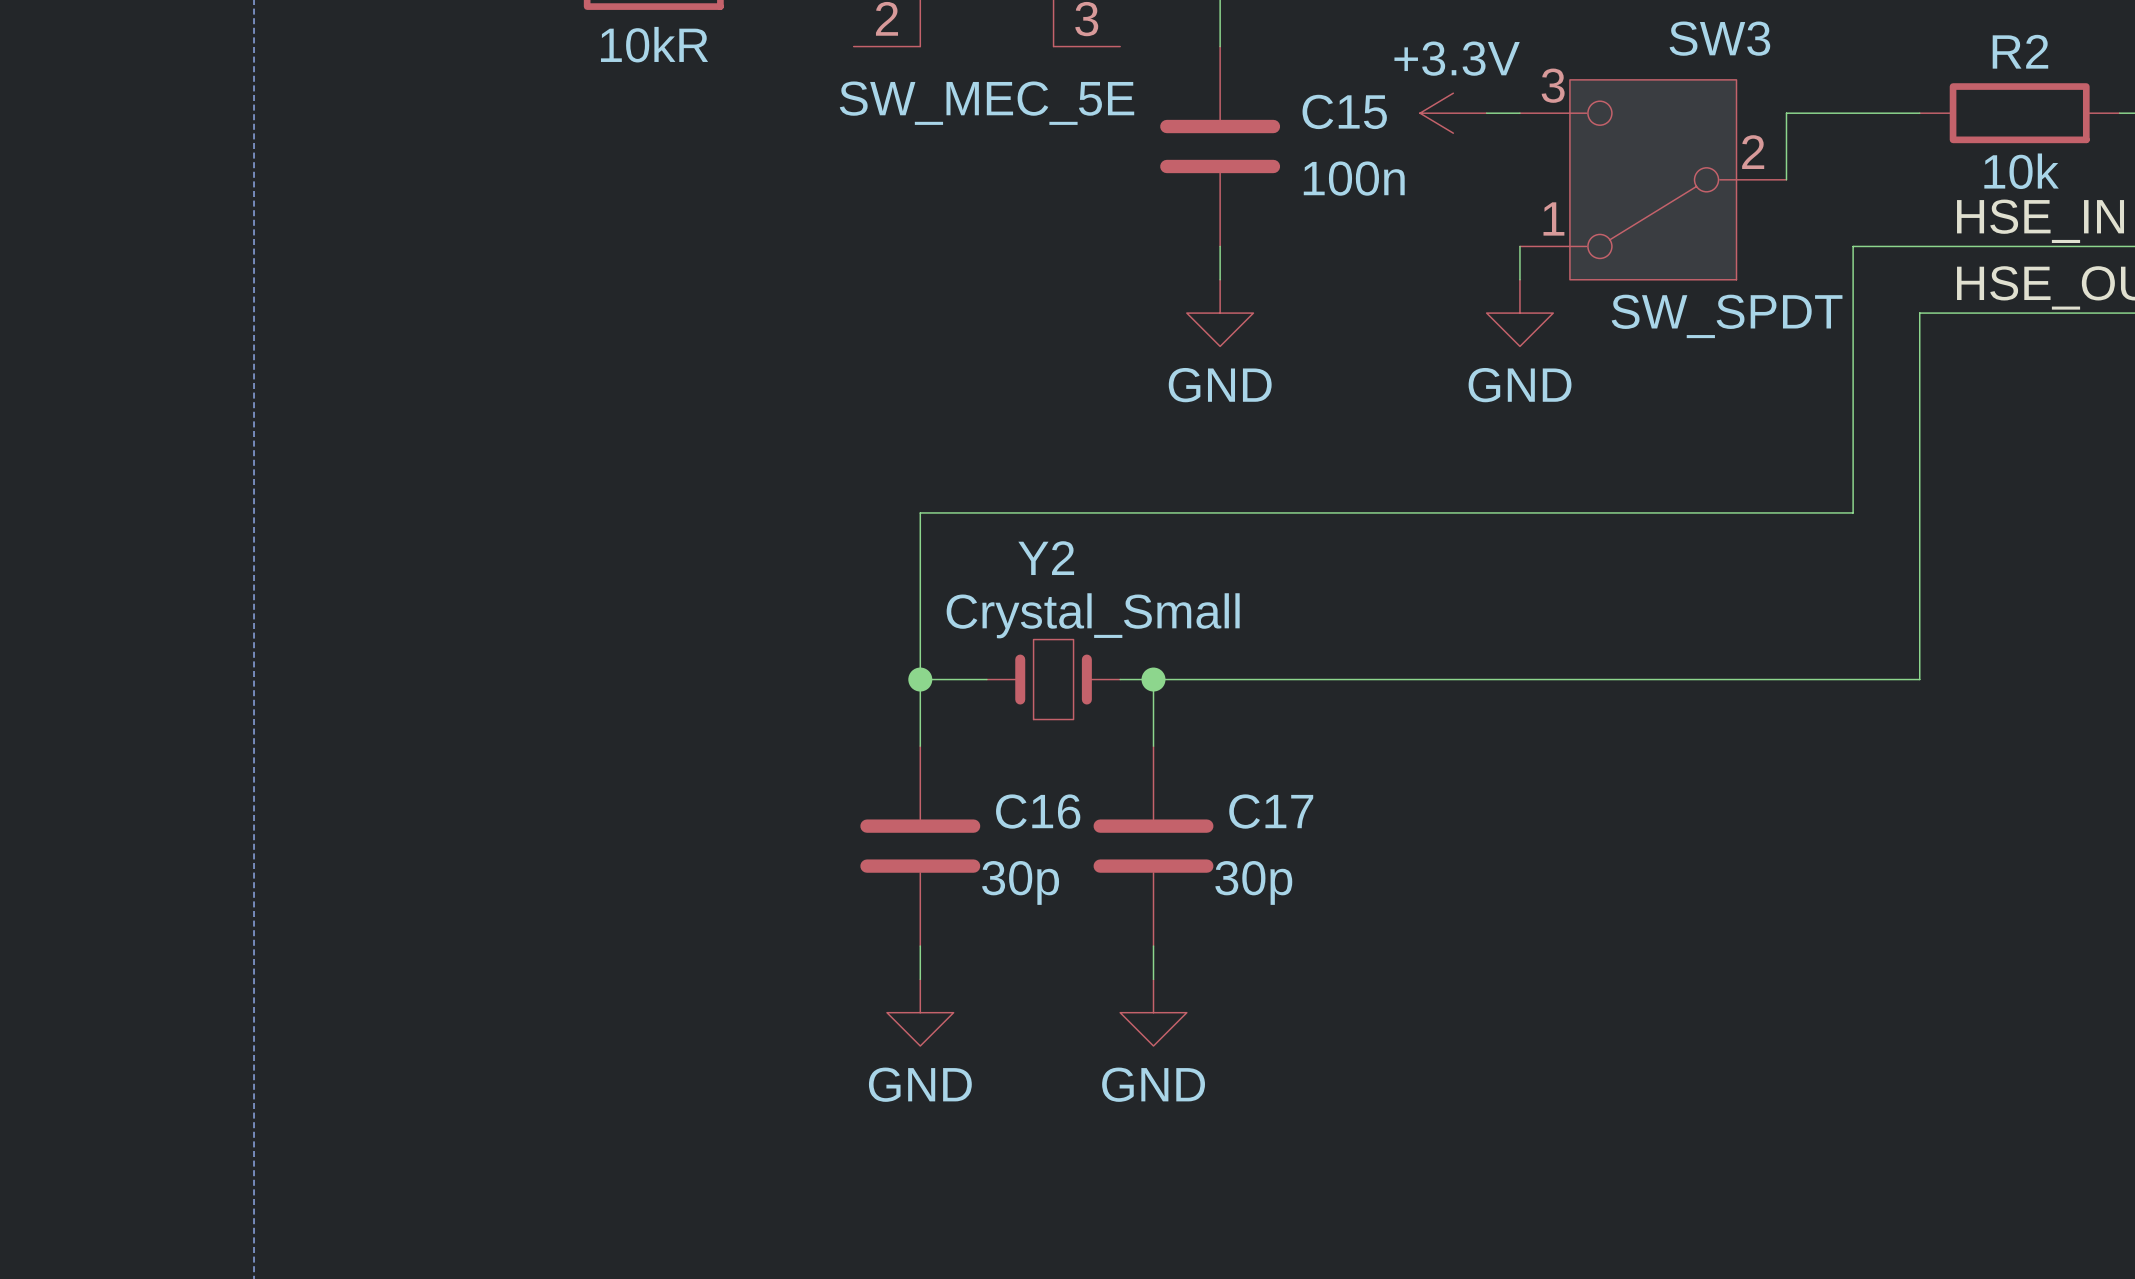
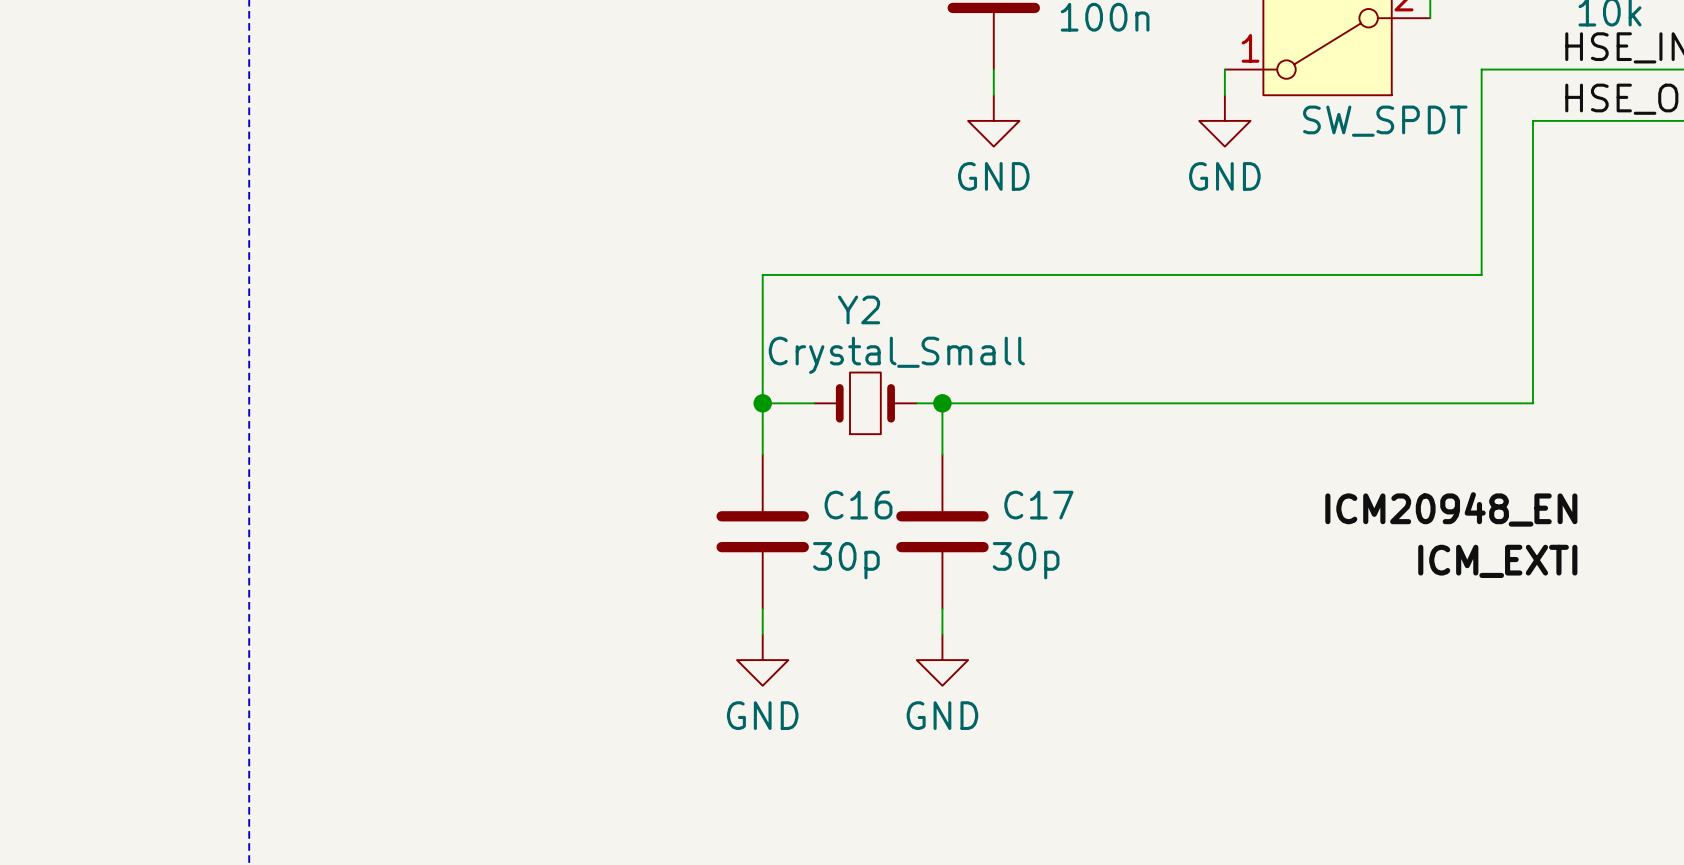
label: none -> ICM20948_EN (1451, 509)
label: none -> ICM_EXTI (1497, 561)

